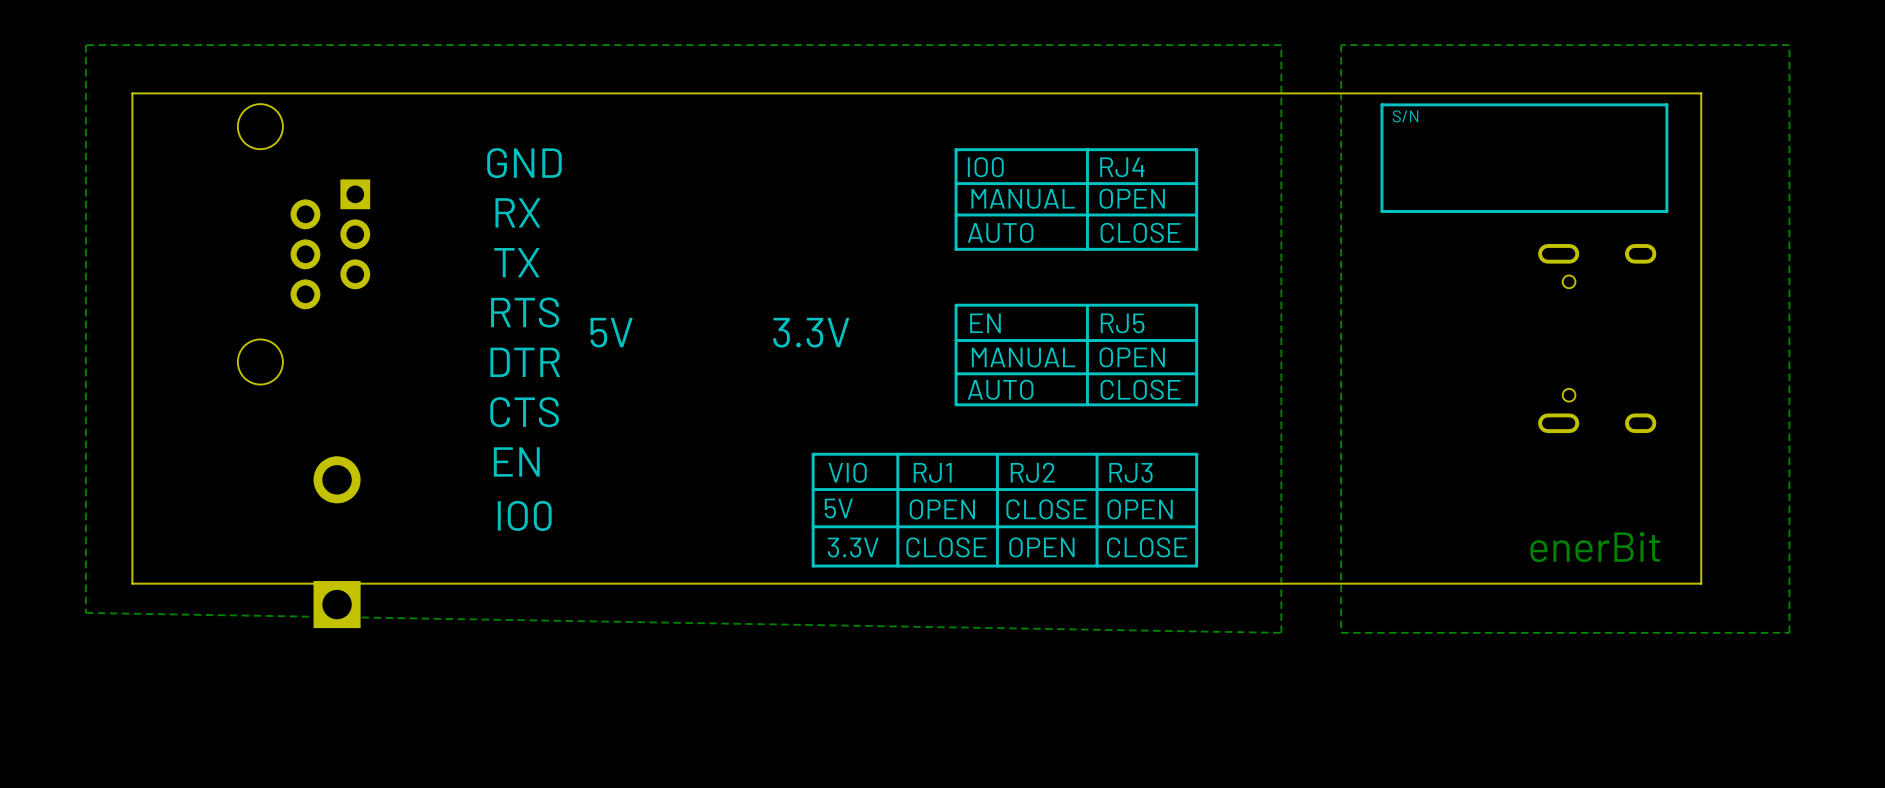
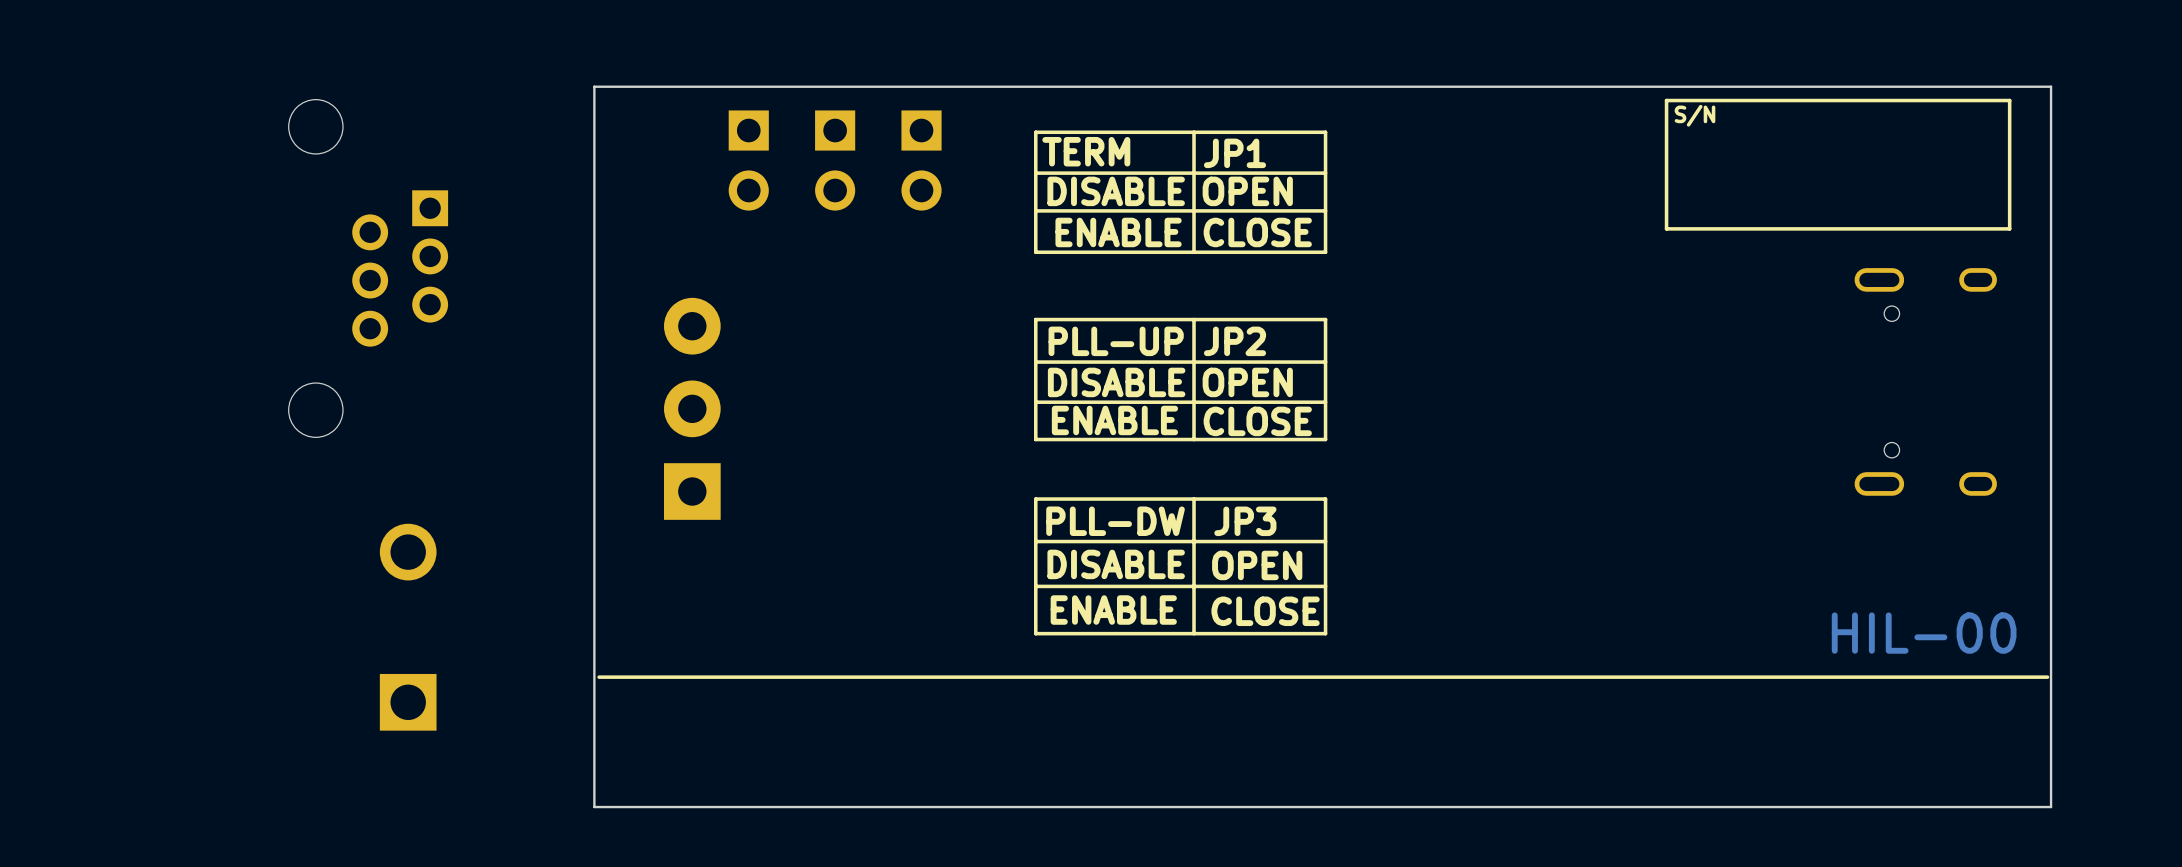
zone outline: (1281, 45) (85, 45) (85, 612) (1281, 632) (1281, 45) -> none
zone outline: (1789, 45) (1789, 632) (1341, 632) (1341, 45) (1789, 45) -> none
board edge: (491, 93) (132, 93) (132, 583) (1701, 583) -> (594, 86) (594, 807) (2051, 807) (2051, 677)
text: none -> TERM (1086, 151)
text: none -> JP1 (1235, 153)
line: (1087, 149) (1087, 249) -> (1194, 132) (1194, 252)
line: (1196, 149) (1196, 249) (956, 249) (956, 149) (1196, 149) -> (1325, 132) (1325, 252) (1035, 252) (1035, 132) (1325, 132)
part: none -> (748, 160)
part: none -> (835, 160)
part: none -> (921, 160)
text: GND (524, 163) -> none
text: IO0 (985, 167) -> none
text: RJ4 (1122, 167) -> none
text: none -> DISABLE (1116, 191)
text: none -> OPEN (1247, 191)
line: (1196, 183) (956, 183) -> (1325, 173) (1035, 173)
text: MANUAL (1023, 198) -> none
text: OPEN (1132, 198) -> none
text: RX (517, 212) -> none
text: none -> ENABLE (1118, 232)
line: (1196, 214) (956, 214) -> (1325, 210) (1035, 210)
text: AUTO (1000, 232) -> none
text position: CLOSE (1140, 232) -> CLOSE (1257, 232)
text: TX (516, 262) -> none
text: none -> PLL-UP (1116, 341)
text: none -> JP2 (1235, 341)
line: (1087, 305) (1087, 404) -> (1194, 319) (1194, 439)
line: (1196, 305) (1196, 404) (956, 404) (956, 305) (1196, 305) -> (1325, 319) (1325, 439) (1035, 439) (1035, 319) (1325, 319)
text: RTS (525, 312) -> none
text: EN (985, 323) -> OPEN (1247, 382)
text: RJ5 (1122, 323) -> none
text: 5V (611, 332) -> none
text: 3.3V (811, 332) -> none
text: none -> DISABLE (1116, 382)
line: (1196, 340) (956, 340) -> (1325, 362) (1035, 362)
text: MANUAL (1023, 357) -> none
text: OPEN (1132, 357) -> none
part: none -> (692, 408)
text: DTR (525, 362) -> none
text: none -> ENABLE (1114, 420)
line: (1196, 373) (956, 373) -> (1325, 402) (1035, 402)
text: AUTO (1000, 389) -> none
text position: CLOSE (1140, 389) -> CLOSE (1257, 421)
text: CTS (524, 412) -> none
line: none -> (1325, 499) (1325, 633) (1035, 633) (1035, 499) (1325, 499)
line: (897, 454) (897, 566) -> none
text: none -> PLL-DW (1115, 521)
line: (997, 454) (997, 566) -> (1194, 499) (1194, 633)
text: none -> JP3 (1245, 521)
line: (1097, 454) (1097, 566) -> none
line: (1196, 454) (1196, 566) (813, 566) (813, 454) (1196, 454) -> none
text: EN (516, 461) -> none
line: none -> (1325, 541) (1035, 541)
text: VIO (847, 472) -> none
text: RJ1 (932, 472) -> none
text: RJ2 (1032, 472) -> none
text: RJ3 (1130, 472) -> none
line: (1196, 489) (813, 489) -> none
text: none -> DISABLE (1116, 564)
text: none -> OPEN (1257, 565)
text: 5V (838, 508) -> none
line: none -> (1325, 586) (1035, 586)
text: OPEN (942, 509) -> none
text position: CLOSE (1046, 509) -> CLOSE (1265, 611)
text: OPEN (1140, 509) -> none
text: IO0 (524, 515) -> none
line: (1196, 526) (813, 526) -> none
text: none -> ENABLE (1113, 610)
text: 3.3V (853, 547) -> none
text: CLOSE (946, 547) -> none
text: OPEN (1041, 547) -> none
text: CLOSE (1147, 547) -> none
text: enerBit (1595, 547) -> HIL-00 (1924, 633)
line: none -> (2047, 677) (599, 677)

